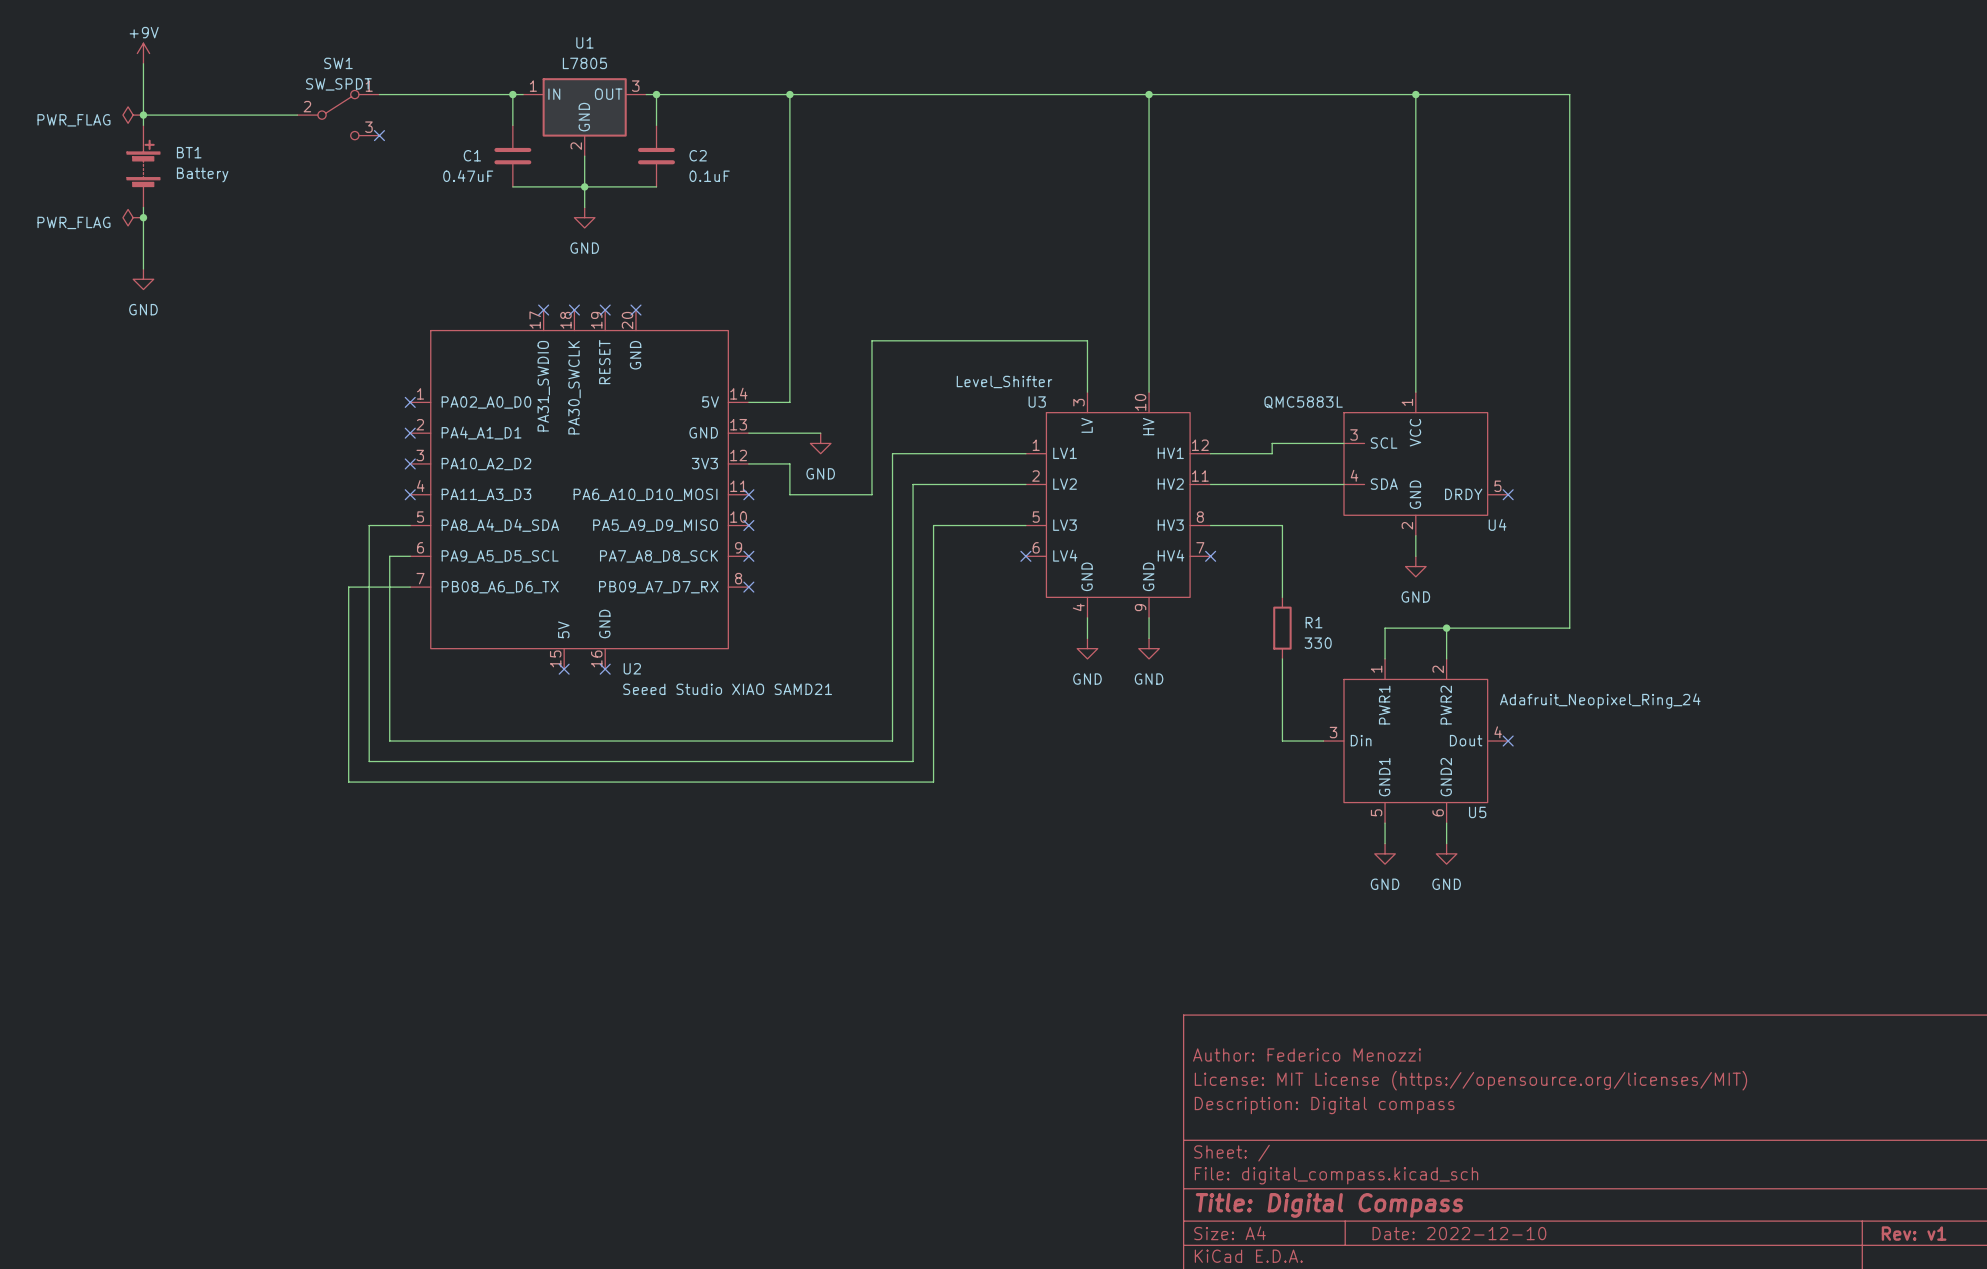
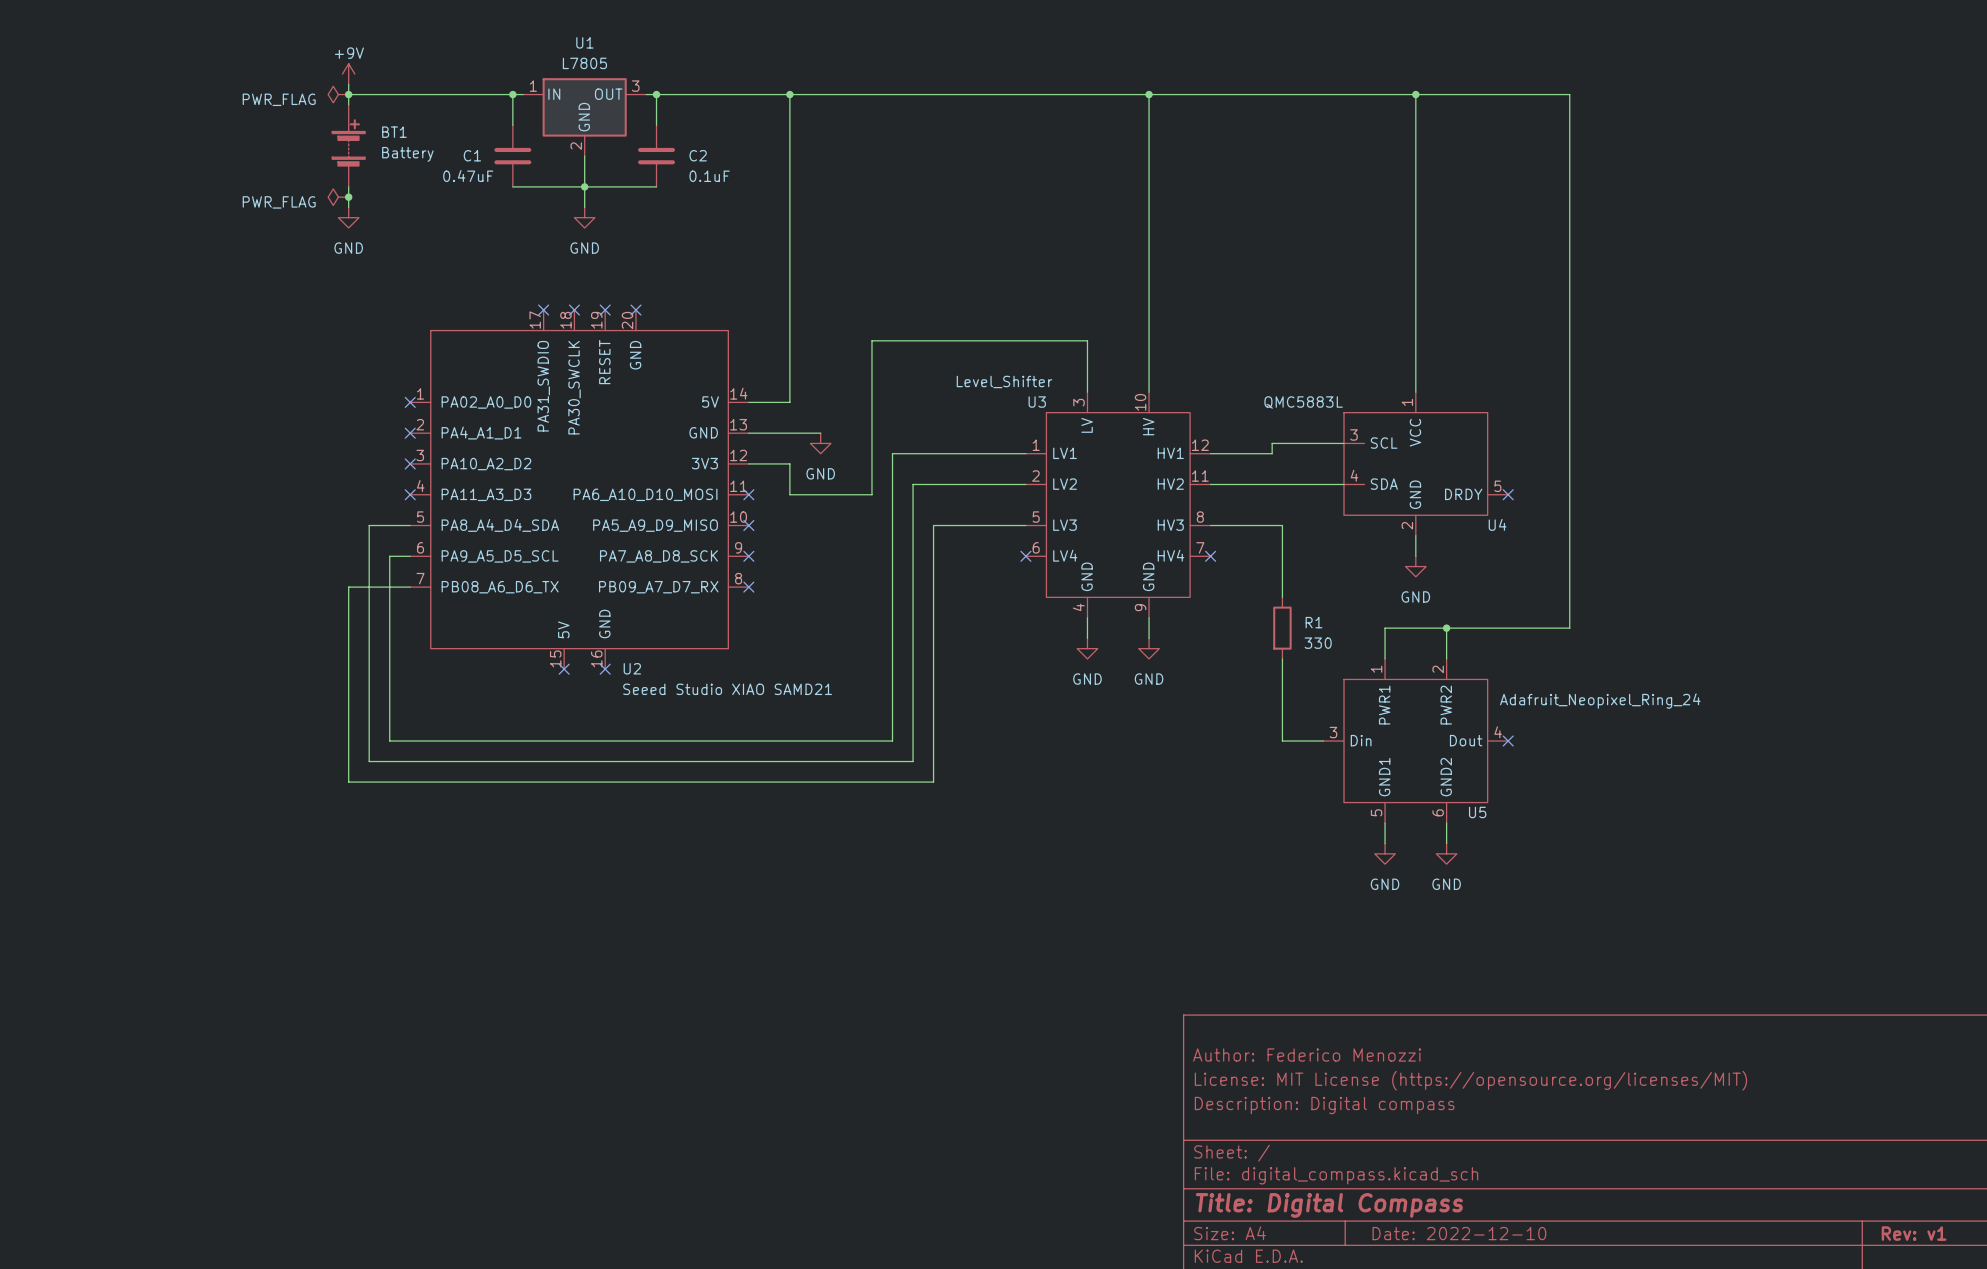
power symbol: +9V (143, 53) -> none
wire: (143, 63) (143, 125) -> none
power symbol: none -> +9V (348, 74)
wire: none -> (348, 84) (348, 104)
power symbol: none -> PWR_FLAG (338, 94)
junction: none -> (348, 94)
power symbol: PWR_FLAG (133, 115) -> none
wire: (143, 115) (297, 115) -> none
junction: (143, 115) -> none
SW1: SW_SPDT (338, 115) -> none
no-connect mark: (379, 135) -> none
BT1 position: (143, 166) -> (348, 145)
wire: none -> (348, 186) (348, 207)
power symbol: none -> PWR_FLAG (338, 197)
junction: none -> (348, 197)
wire: (143, 207) (143, 269) -> none
power symbol: PWR_FLAG (133, 217) -> none
junction: (143, 217) -> none
power symbol: none -> GND (348, 217)
power symbol: GND (143, 279) -> none

